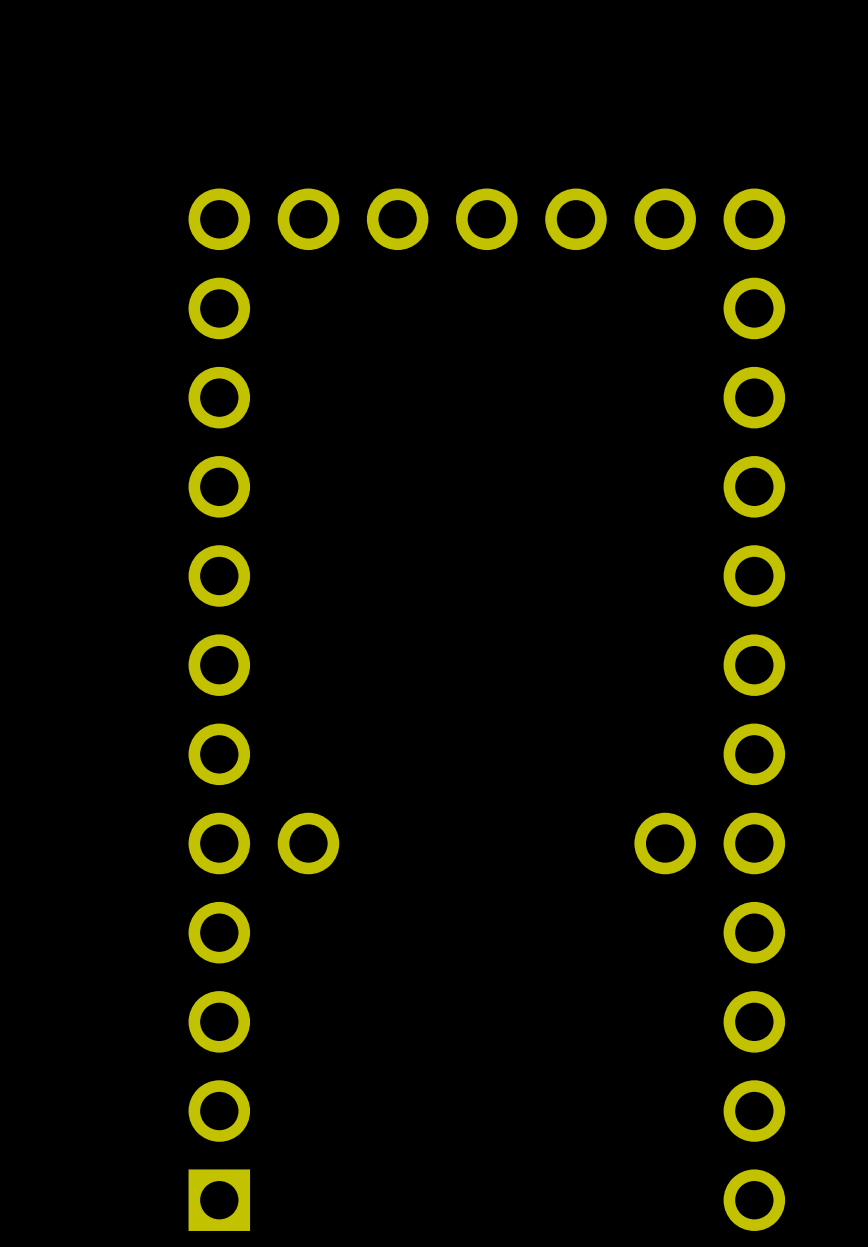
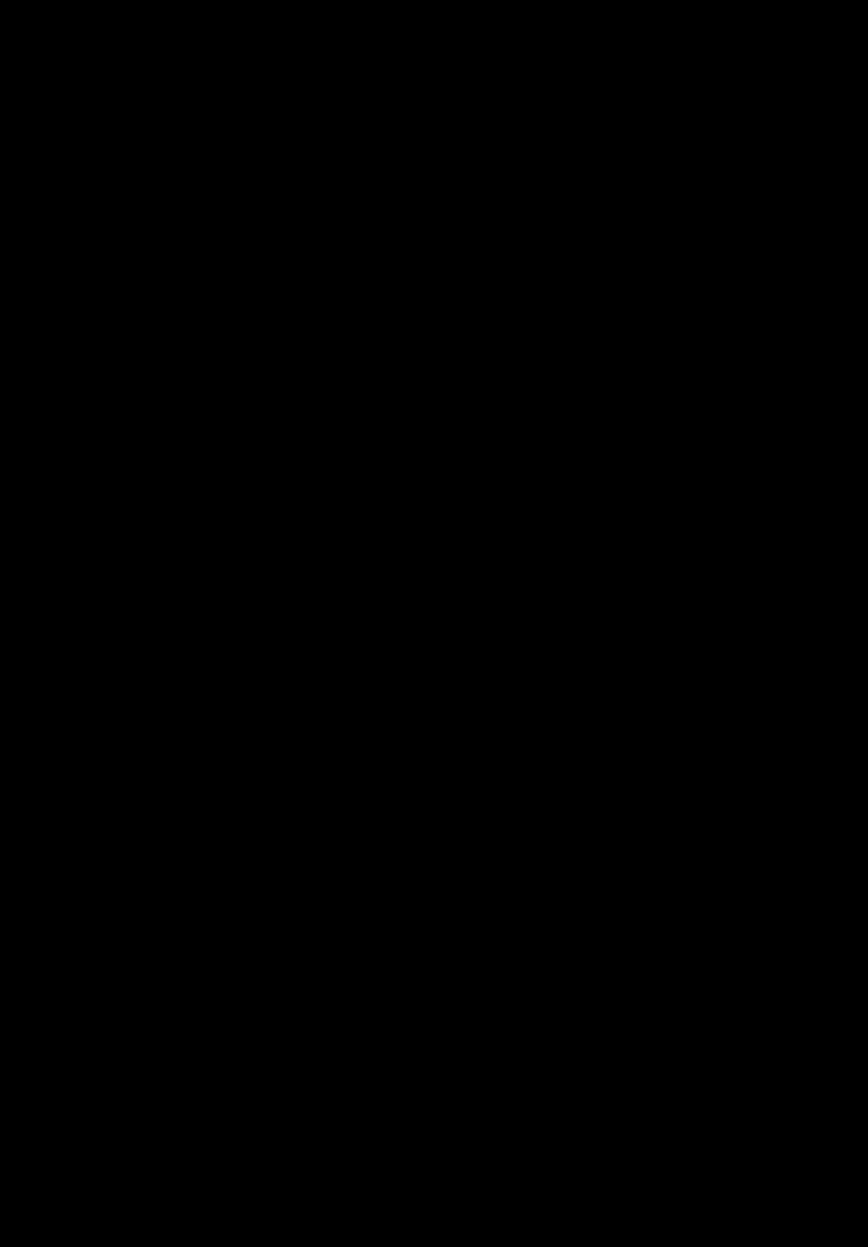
part: (486, 709) -> none

